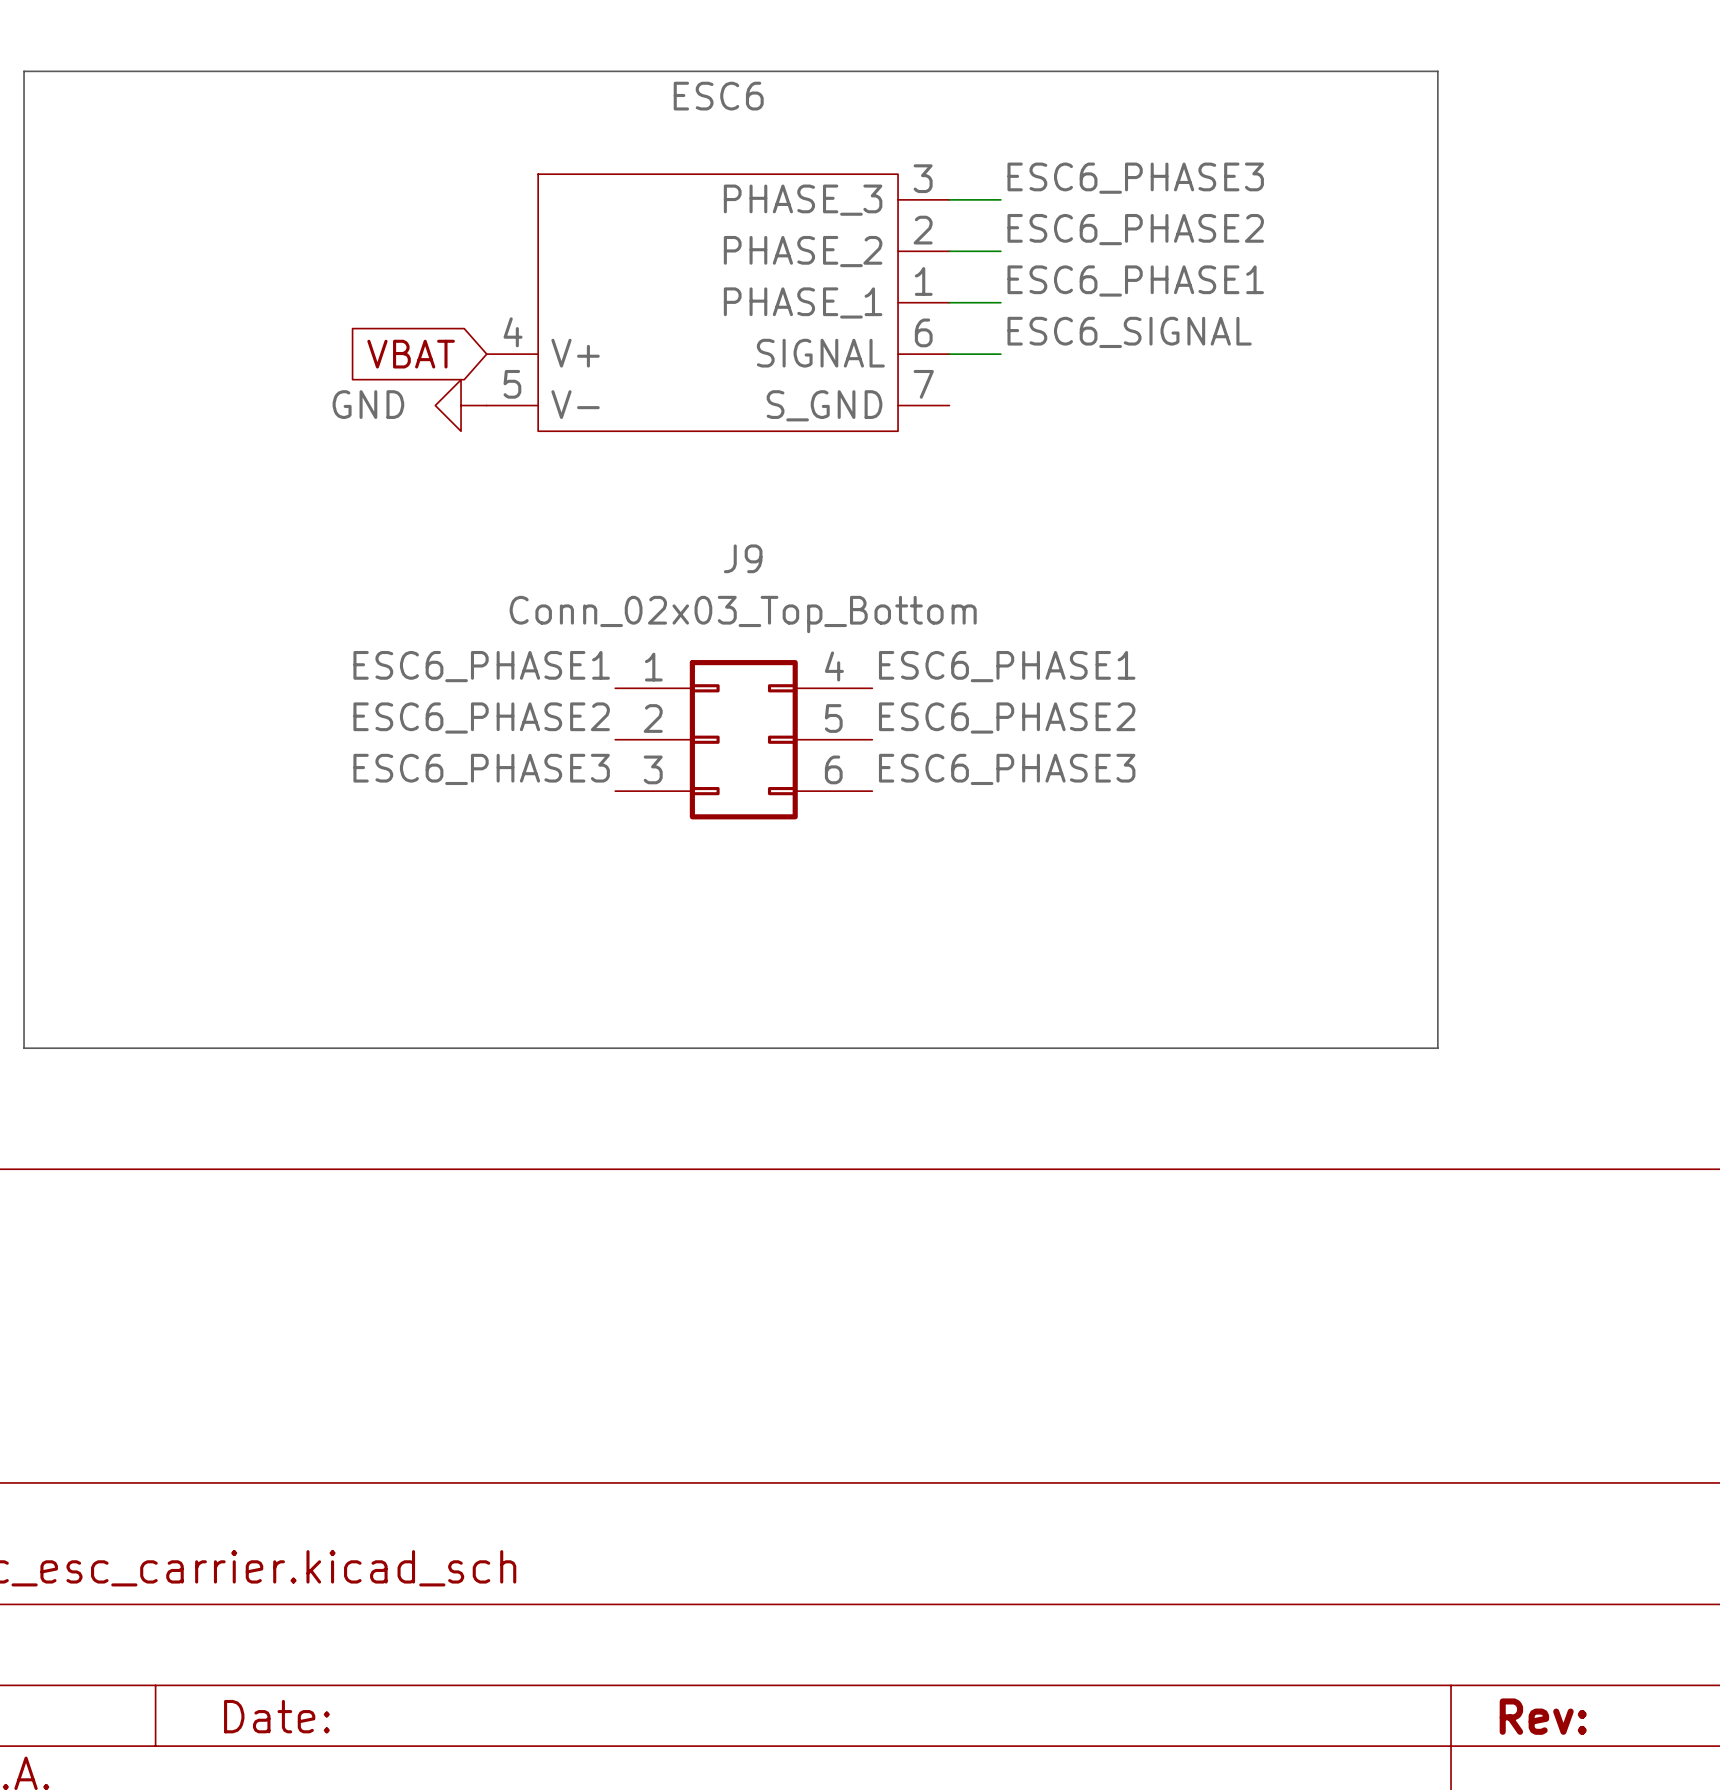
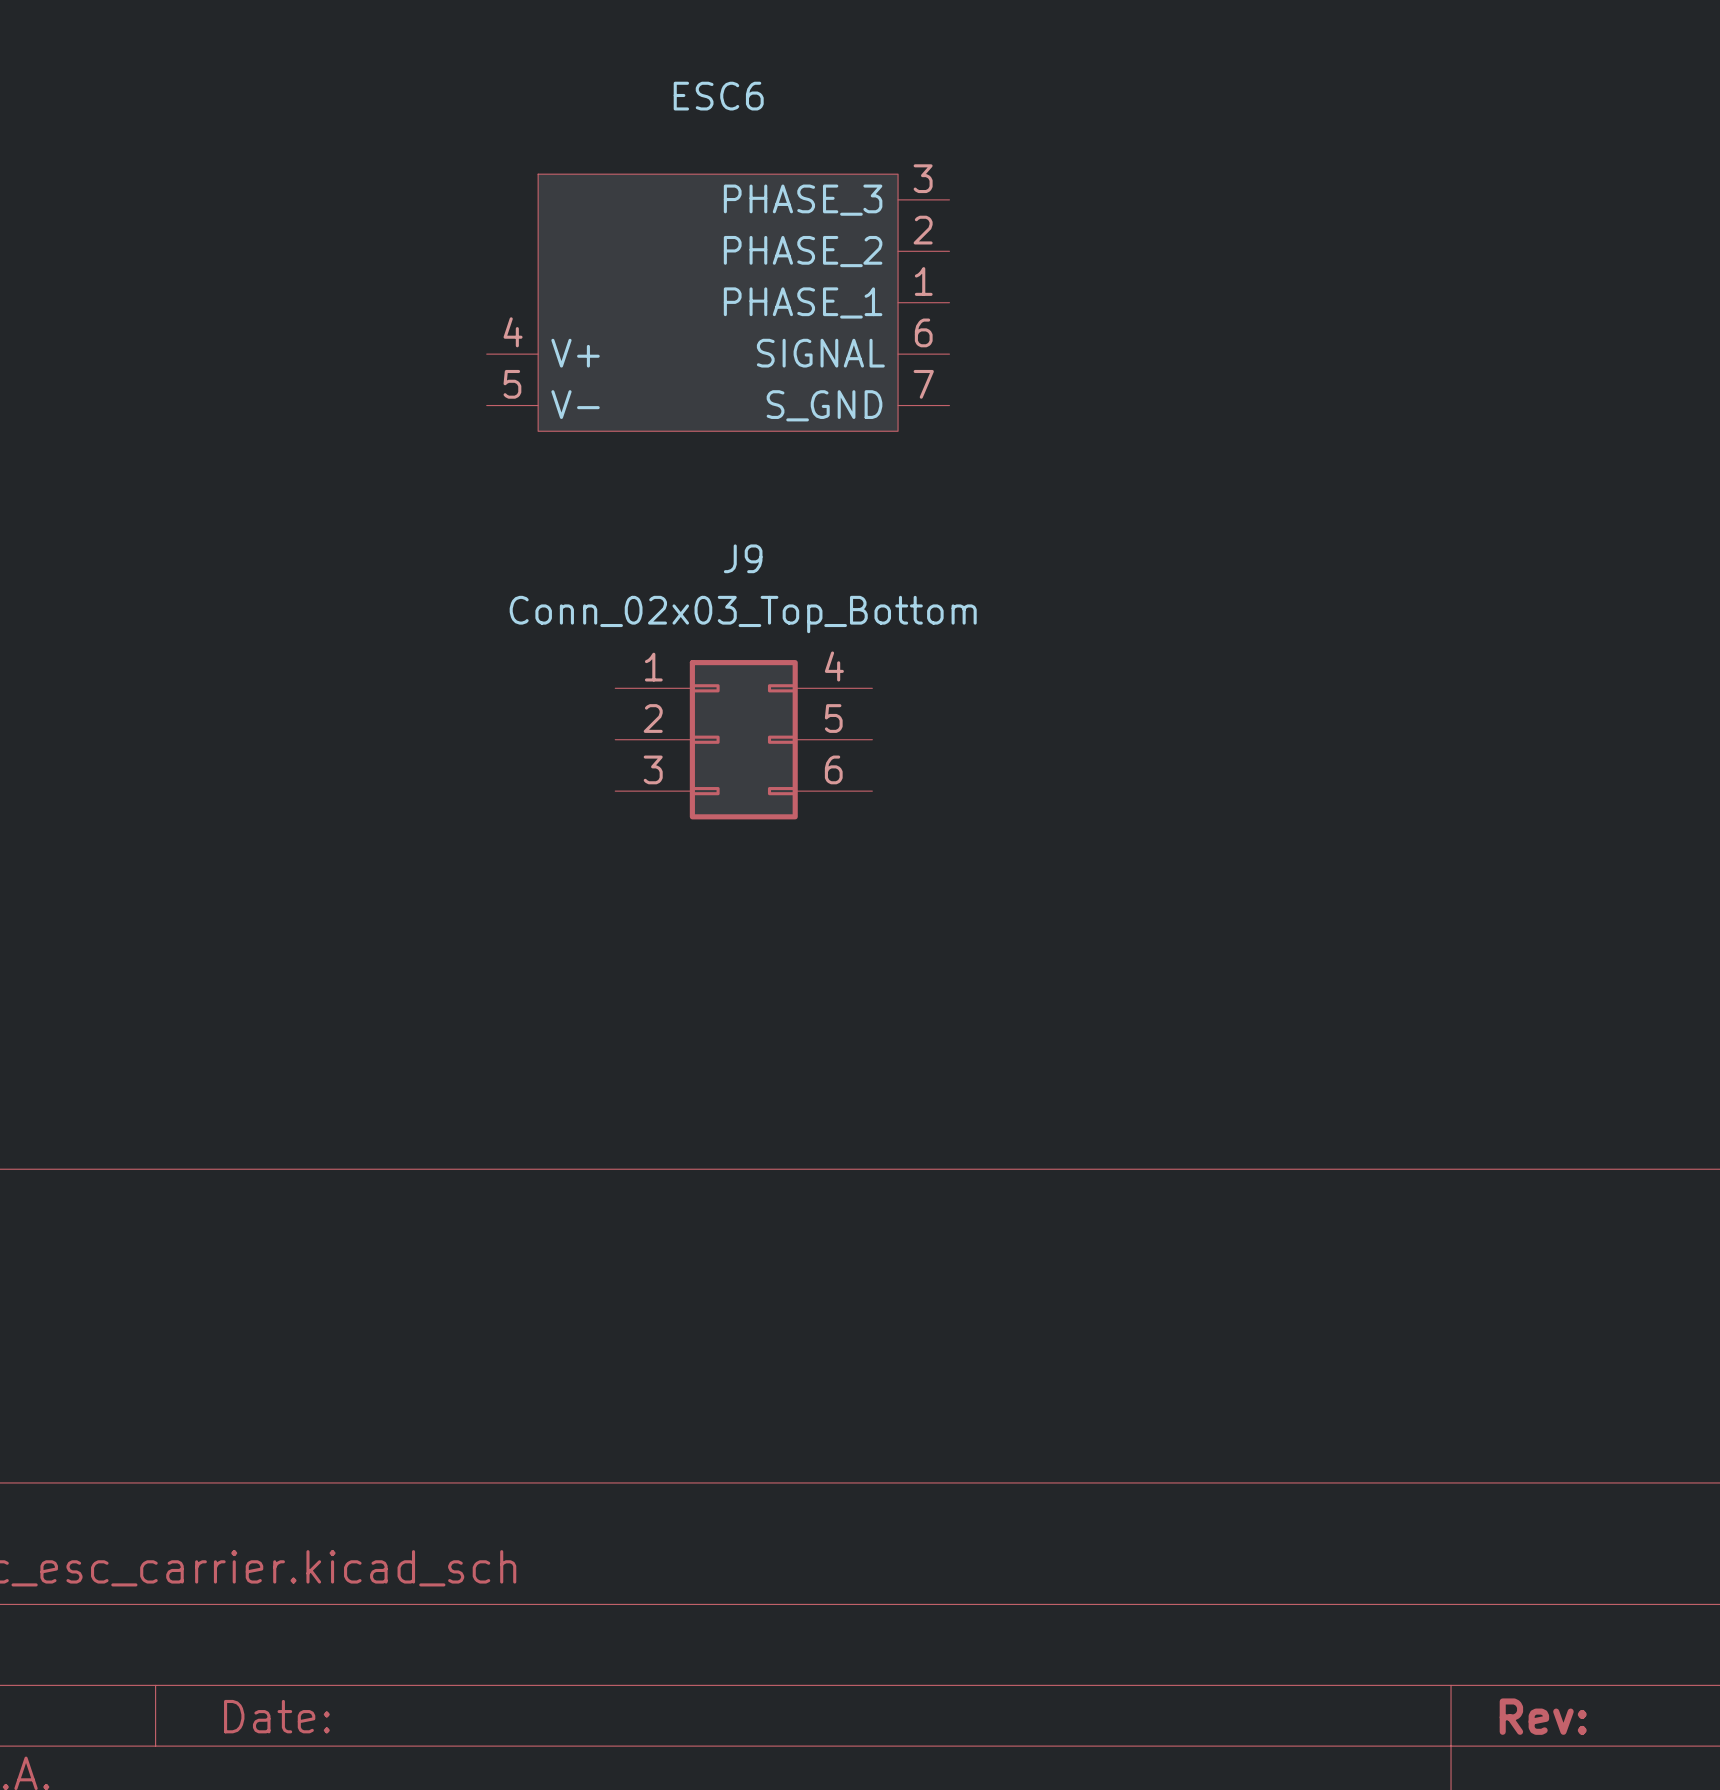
line: (24, 71) (1437, 71) (1437, 1048) (24, 1048) (24, 71) -> none
label: ESC6_PHASE3 (1135, 178) -> none
wire: (949, 199) (1000, 199) -> none
label: ESC6_PHASE2 (1135, 229) -> none
wire: (949, 251) (1000, 251) -> none
label: ESC6_PHASE1 (1135, 281) -> none
wire: (949, 302) (1000, 302) -> none
label: ESC6_SIGNAL (1129, 332) -> none
global label: VBAT (411, 354) -> none
wire: (949, 354) (1000, 354) -> none
power symbol: GND (461, 405) -> none
label: ESC6_PHASE1 (481, 666) -> none
label: ESC6_PHASE1 (1007, 666) -> none
label: ESC6_PHASE2 (481, 718) -> none
label: ESC6_PHASE2 (1007, 718) -> none
label: ESC6_PHASE3 (481, 769) -> none
label: ESC6_PHASE3 (1007, 769) -> none

